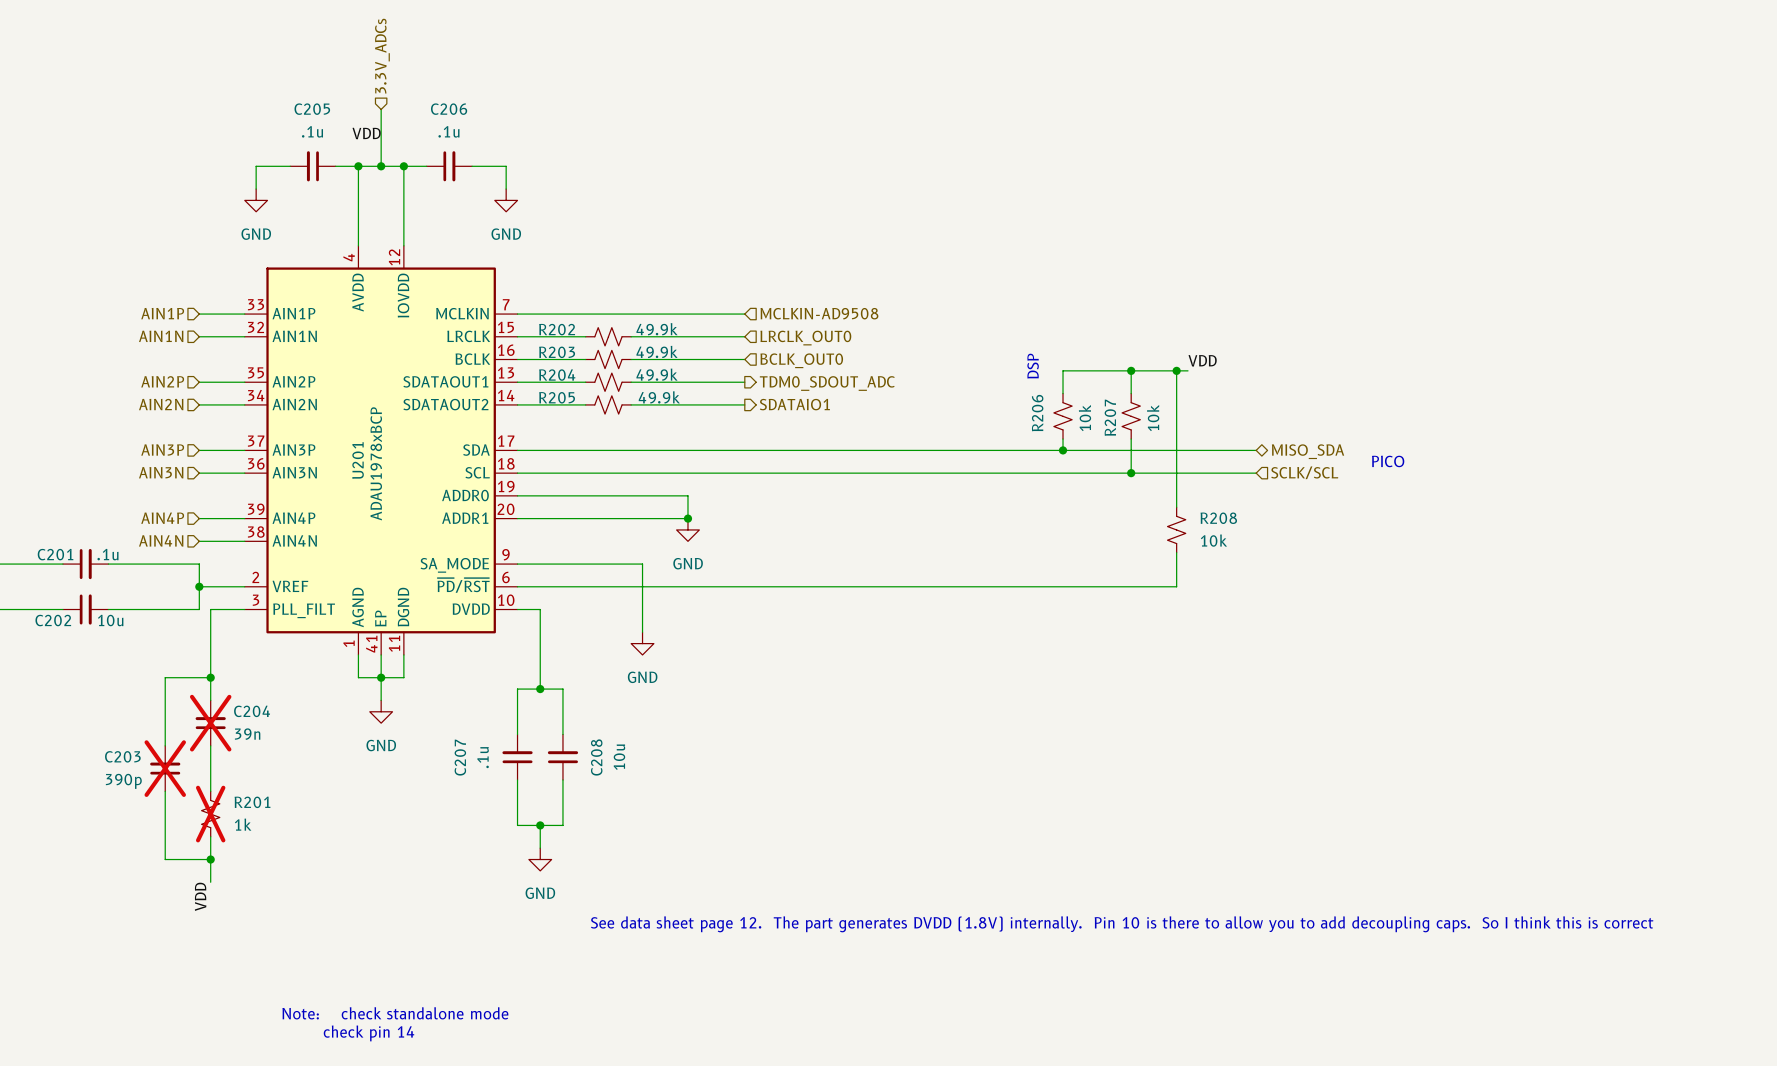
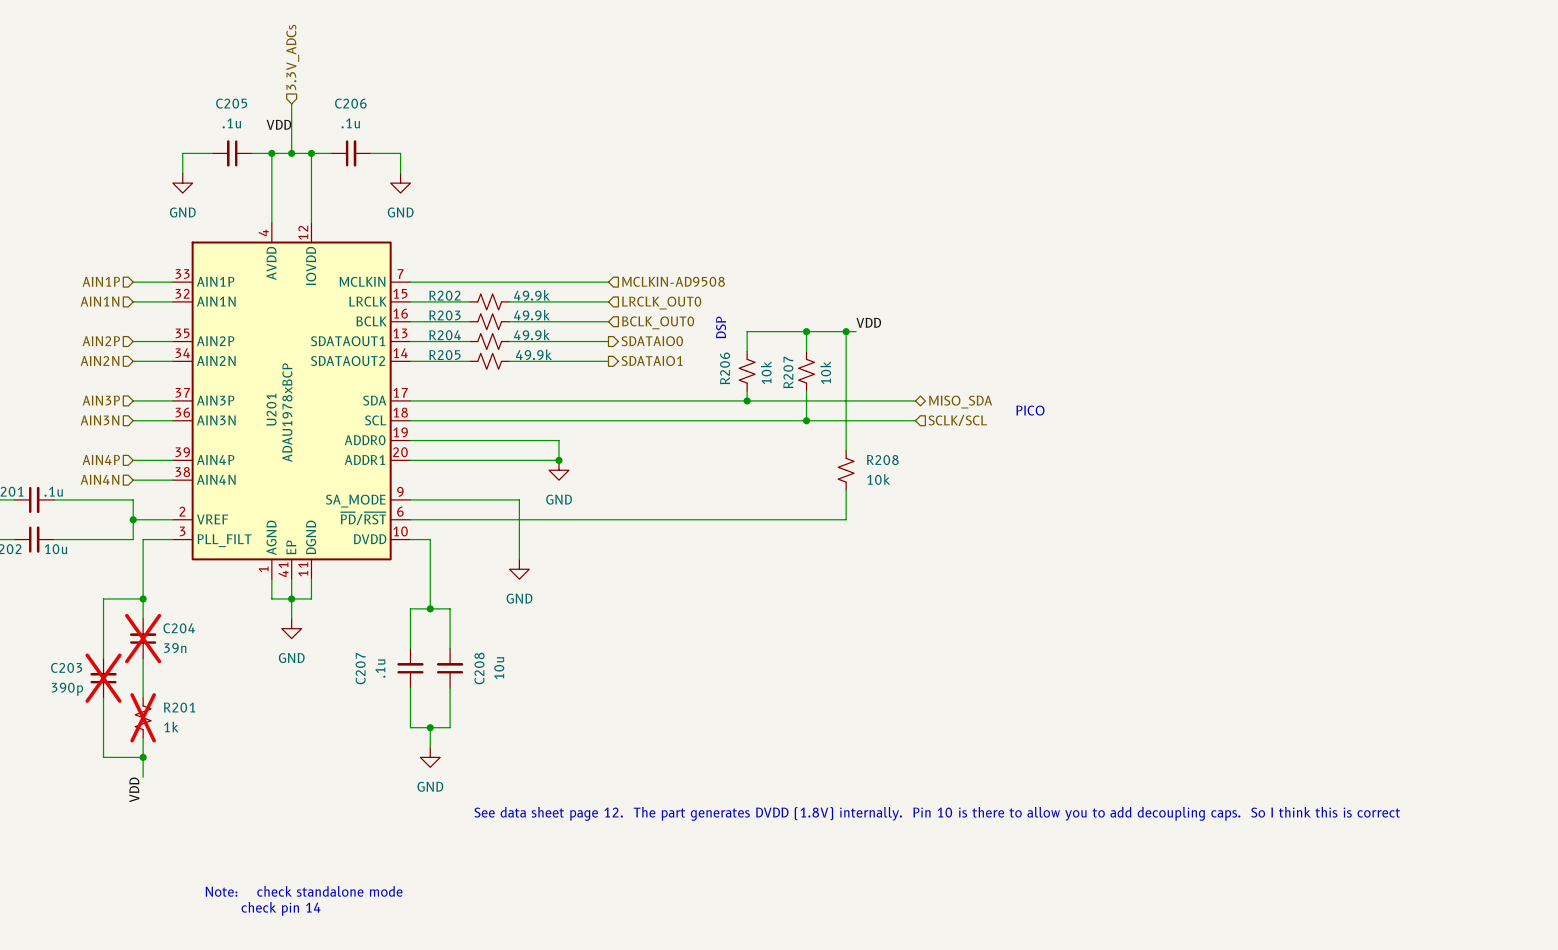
label position: VDD (1202, 360) -> VDD (868, 322)
text position: DSP (1033, 366) -> DSP (721, 327)
junction: none -> (806, 331)
junction: none -> (846, 331)
wire: (1131, 370) (1131, 393) -> (806, 331) (806, 351)
junction: (1131, 370) -> none
wire: (1176, 370) (1176, 507) -> (846, 331) (846, 450)
junction: (1176, 370) -> none
wire: (1188, 370) (1063, 370) (1063, 393) -> (856, 331) (747, 331) (747, 351)
hierarchical label: TDM0_SDOUT_ADC (827, 383) -> SDATAIO0 (652, 341)
R206 position: (1063, 416) -> (747, 371)
R207 position: (1131, 416) -> (806, 371)
wire: (1063, 439) (1063, 450) -> (747, 391) (747, 400)
wire: (1131, 439) (1131, 473) -> (806, 391) (806, 420)
junction: none -> (747, 400)
junction: (1063, 450) -> none
wire: (1097, 450) (1256, 450) -> none
hierarchical label position: MISO_SDA (1308, 451) -> MISO_SDA (960, 402)
text position: PICO (1388, 461) -> PICO (1030, 410)
hierarchical label position: SCLK/SCL (1304, 472) -> SCLK/SCL (957, 420)
junction: none -> (806, 420)
wire: (1097, 473) (1256, 473) -> none
junction: (1131, 473) -> none
R208 position: (1176, 529) -> (846, 470)
wire: (1176, 552) (1176, 586) (1017, 586) -> (846, 490) (846, 519)

